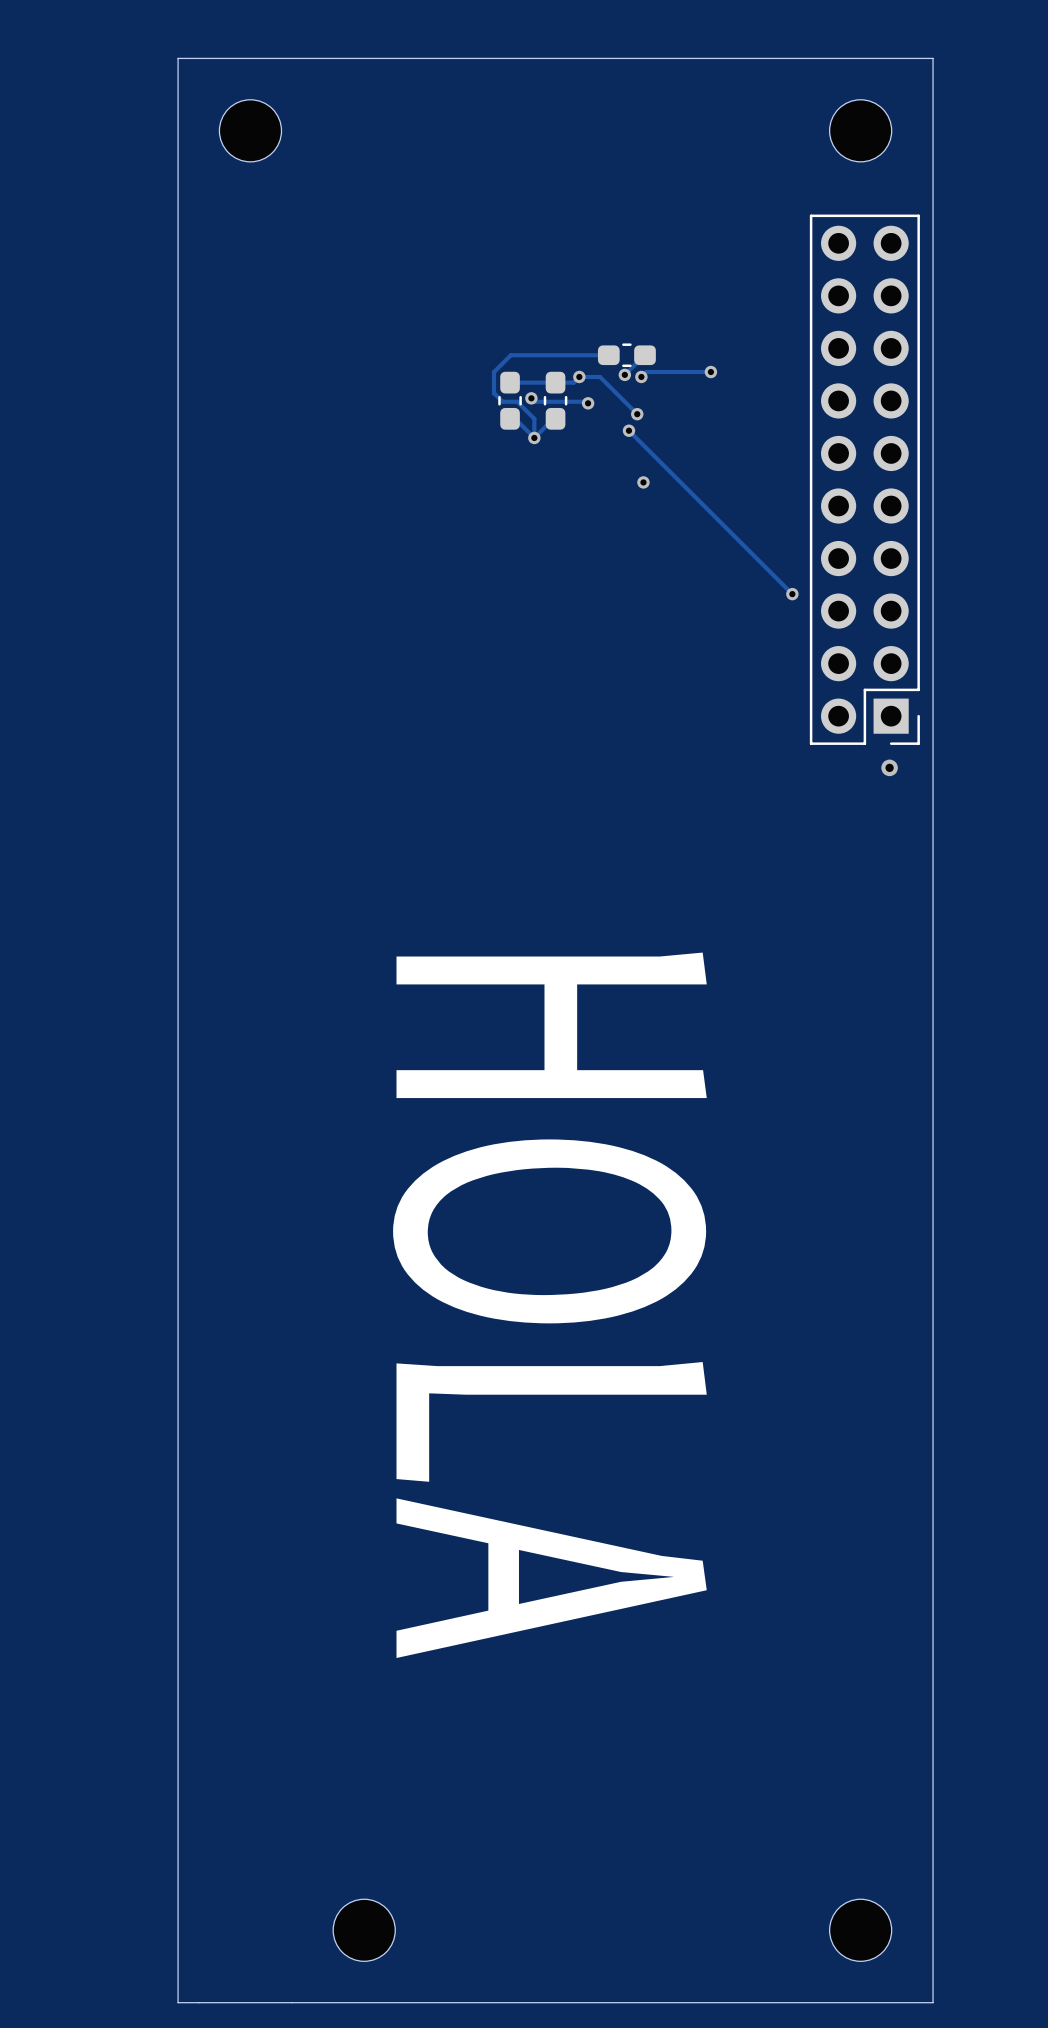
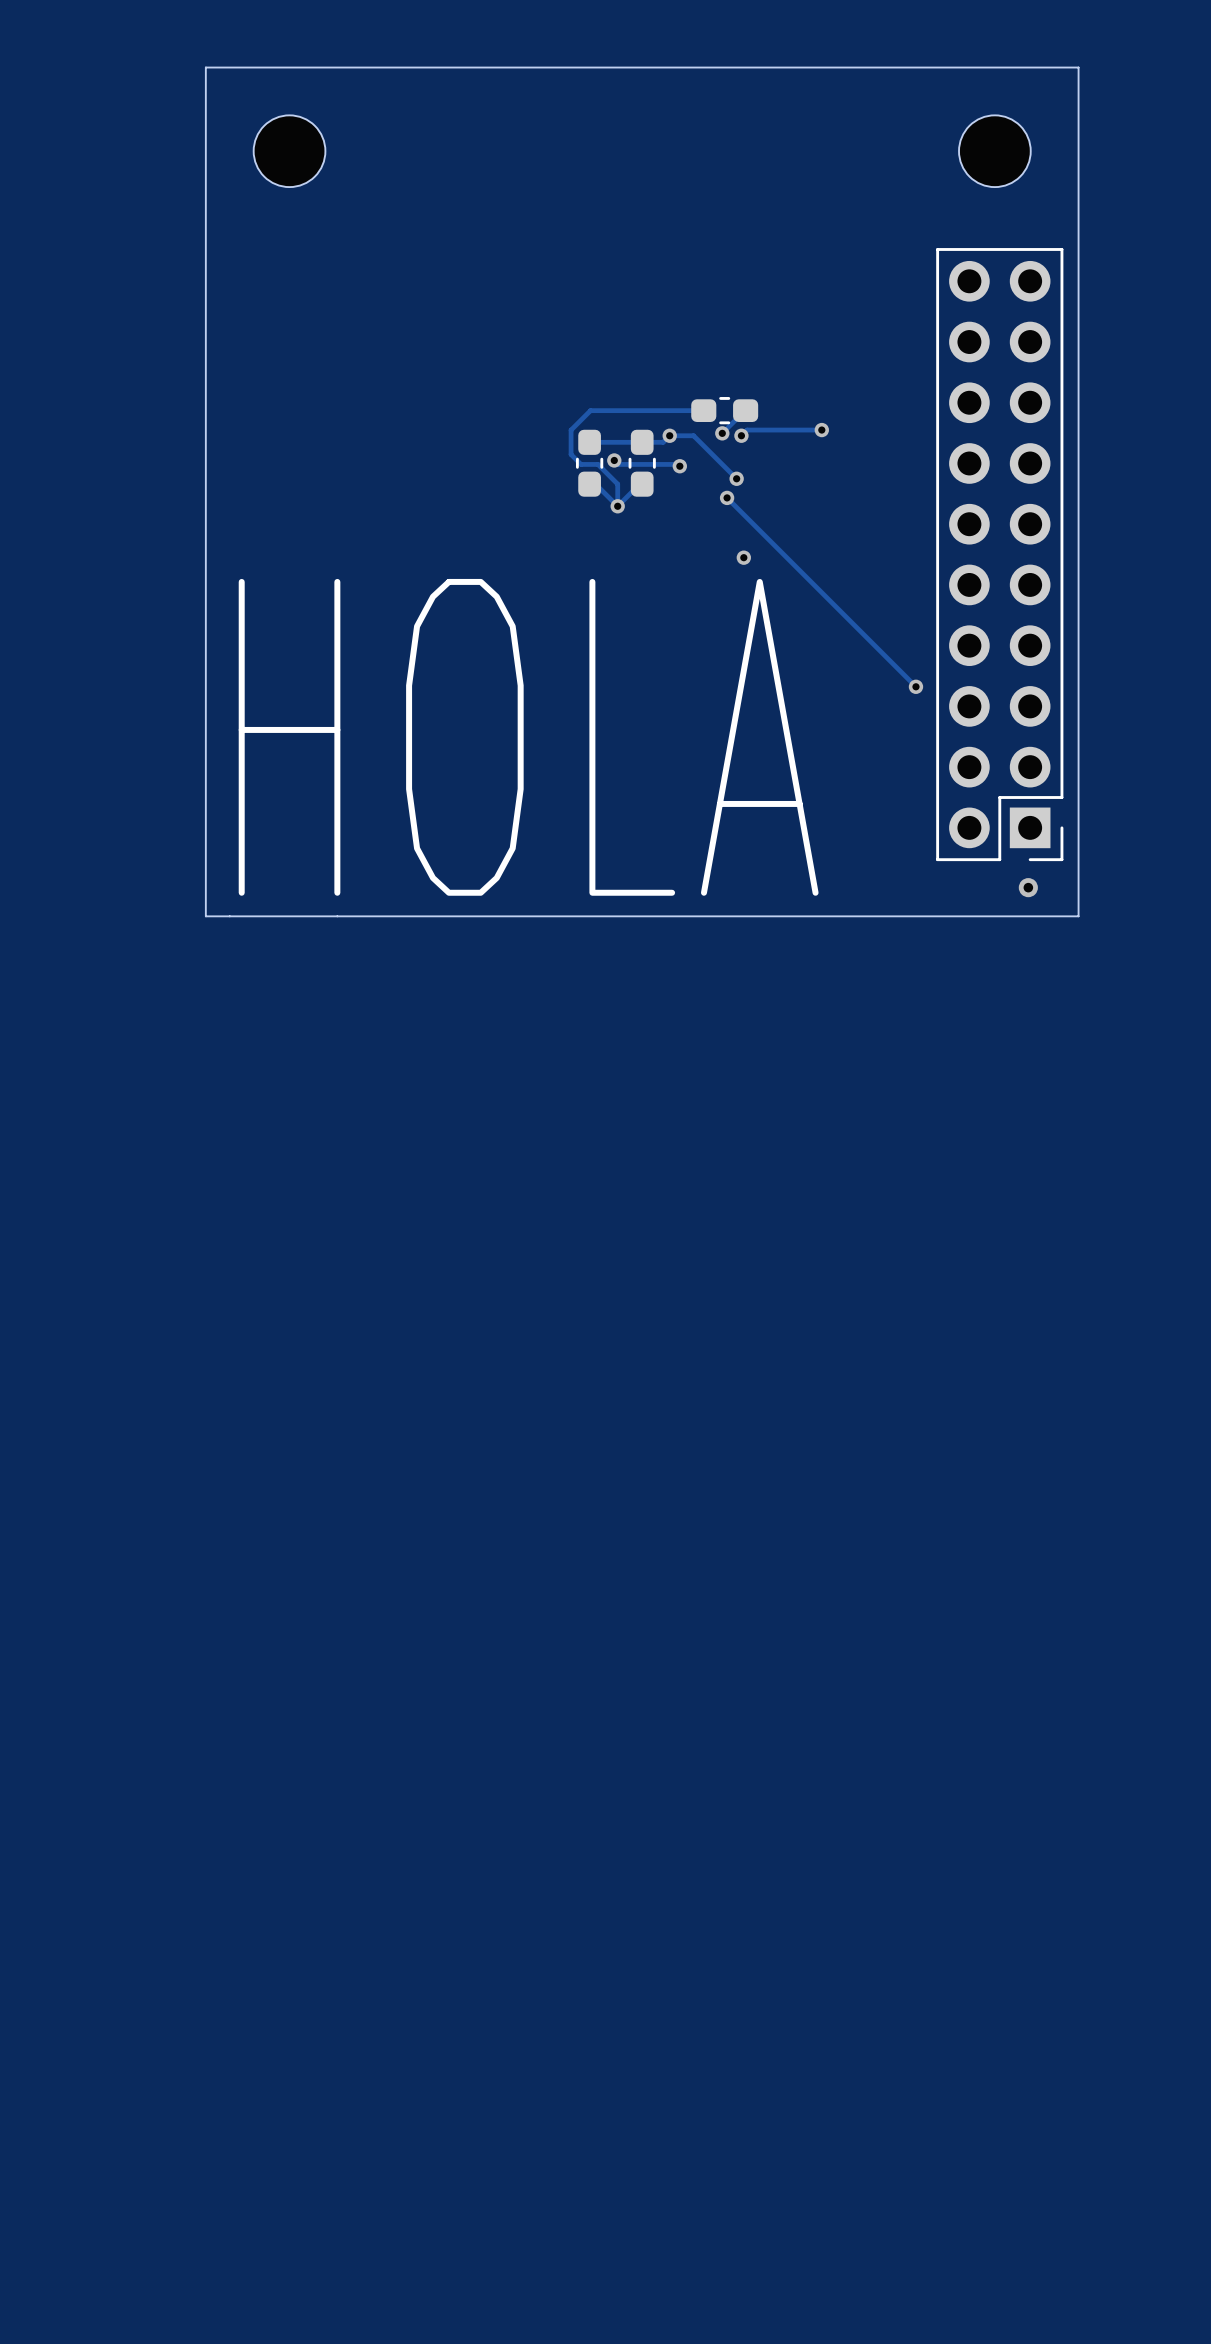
text: none -> HOLA (528, 737)
board edge: (933, 792) (933, 2002) (178, 2002) (178, 792) -> (1078, 916) (205, 916)
text: HOLA (549, 1305) -> none
part: (364, 1930) -> none
part: (860, 1930) -> none

